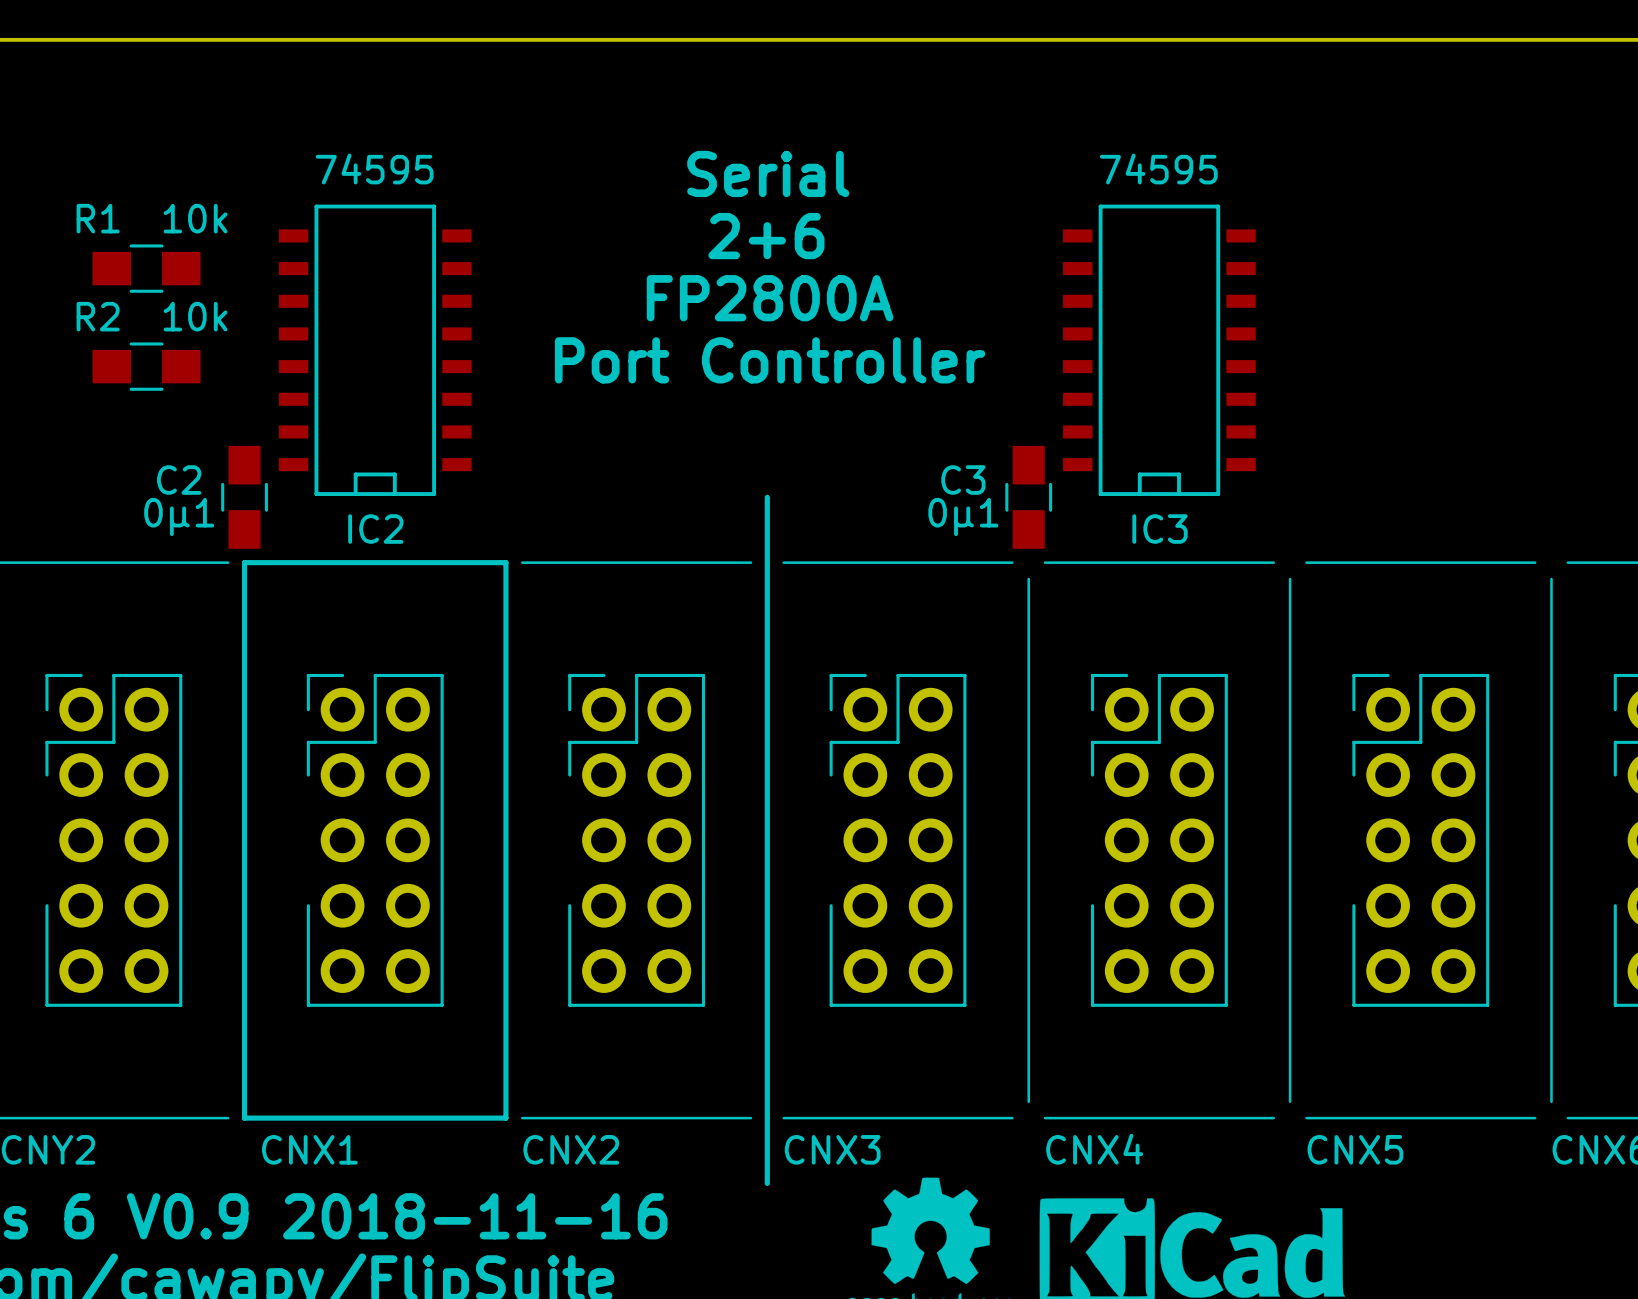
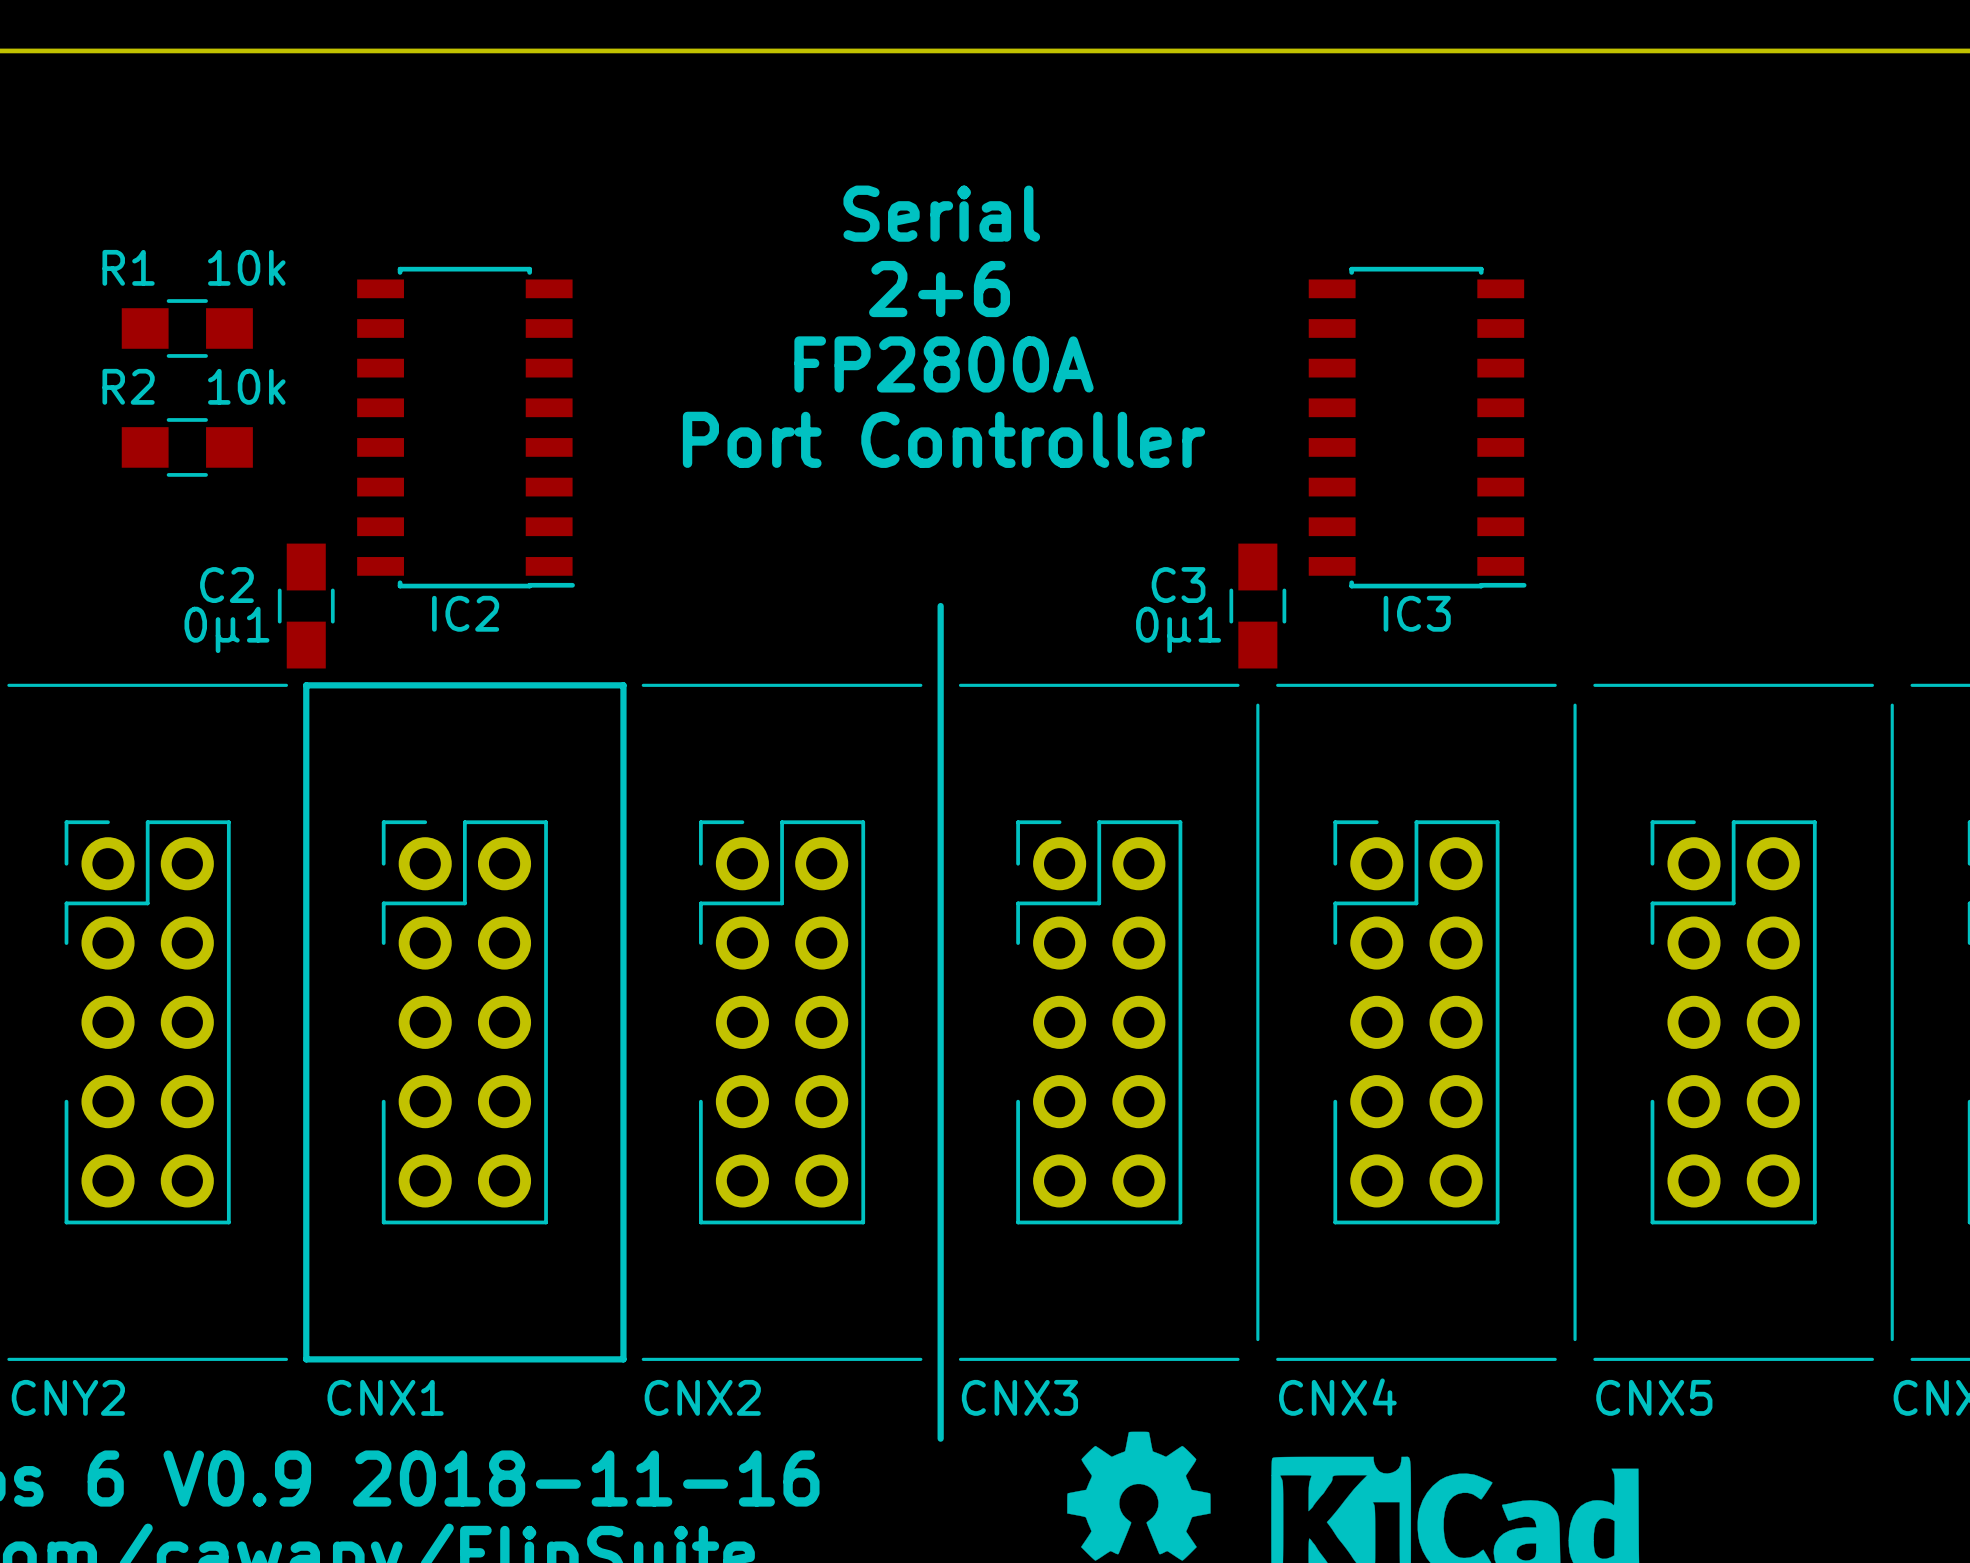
IC2 value: 74595 (374, 169) -> none
IC3 value: 74595 (1158, 169) -> none
IC2 footprint: [278, 204, 472, 496] -> [357, 266, 575, 589]
IC3 footprint: [1063, 204, 1256, 496] -> [1308, 266, 1527, 589]

